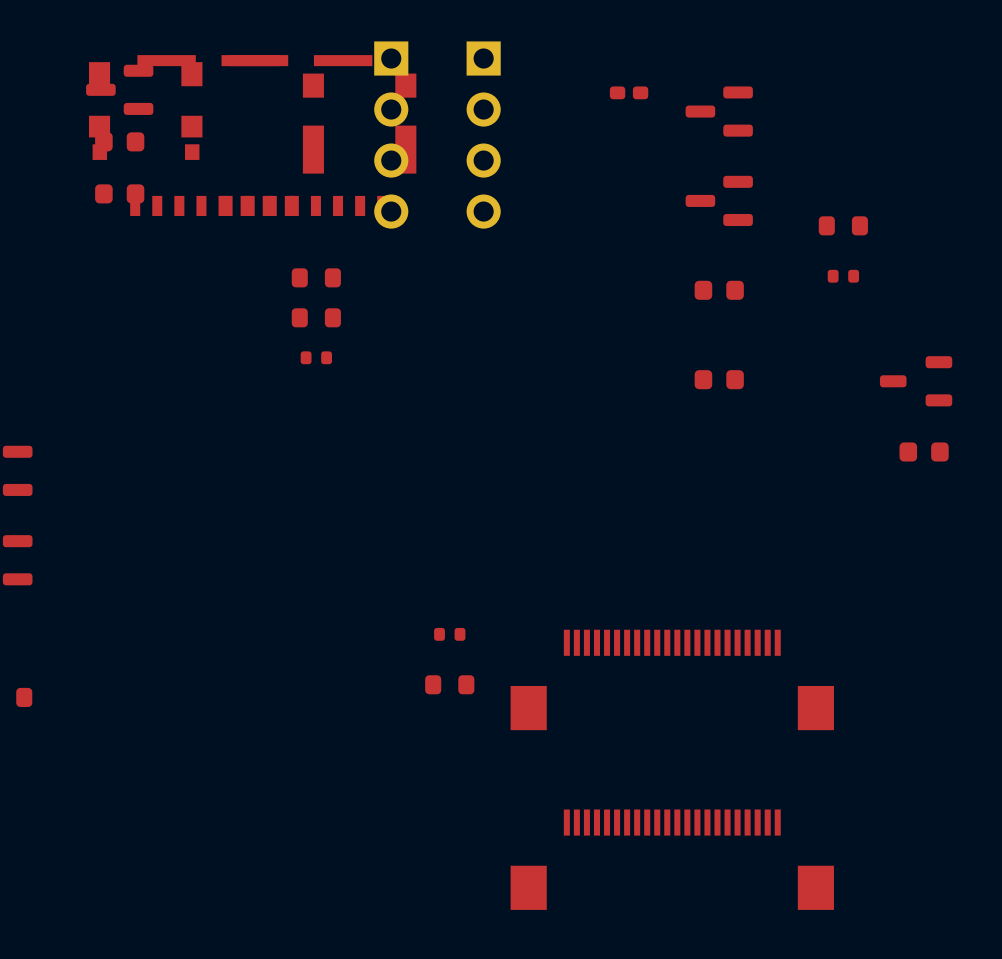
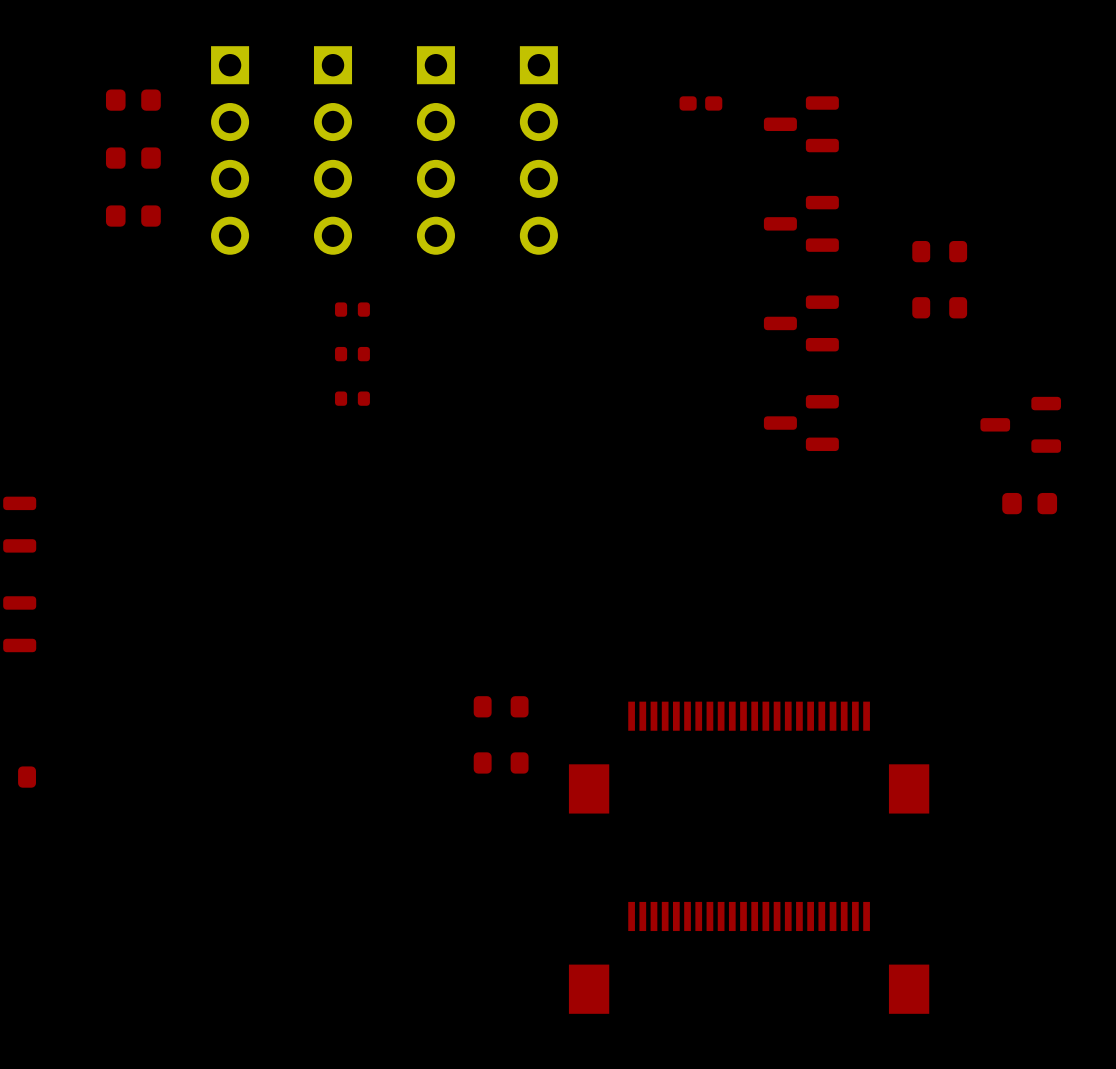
part footprint: [88, 55, 324, 216] -> [211, 46, 250, 255]
part footprint: [181, 55, 417, 216] -> [313, 46, 353, 255]
part footprint: [86, 64, 154, 115] -> [105, 89, 161, 111]
part footprint: [291, 268, 341, 288] -> [335, 302, 370, 317]
part footprint: [827, 269, 860, 283] -> [912, 297, 968, 319]
part footprint: [694, 280, 744, 300] -> [763, 295, 839, 352]
part footprint: [291, 308, 341, 328] -> [335, 346, 370, 362]
part footprint: [694, 370, 744, 390] -> [763, 395, 839, 452]
part footprint: [434, 627, 466, 641] -> [473, 696, 529, 718]

